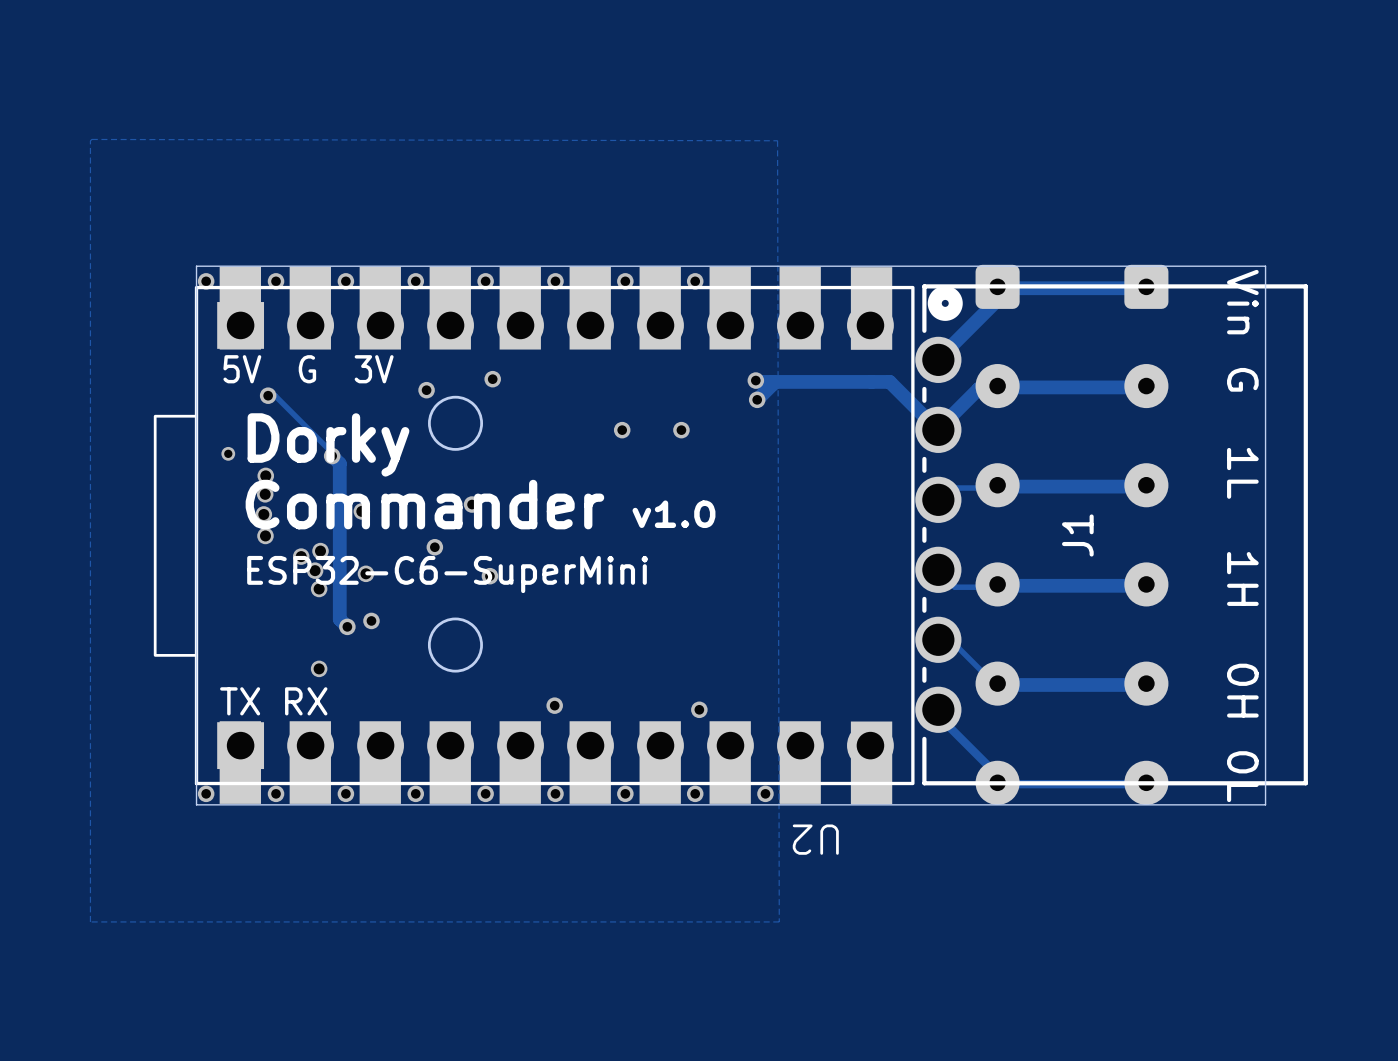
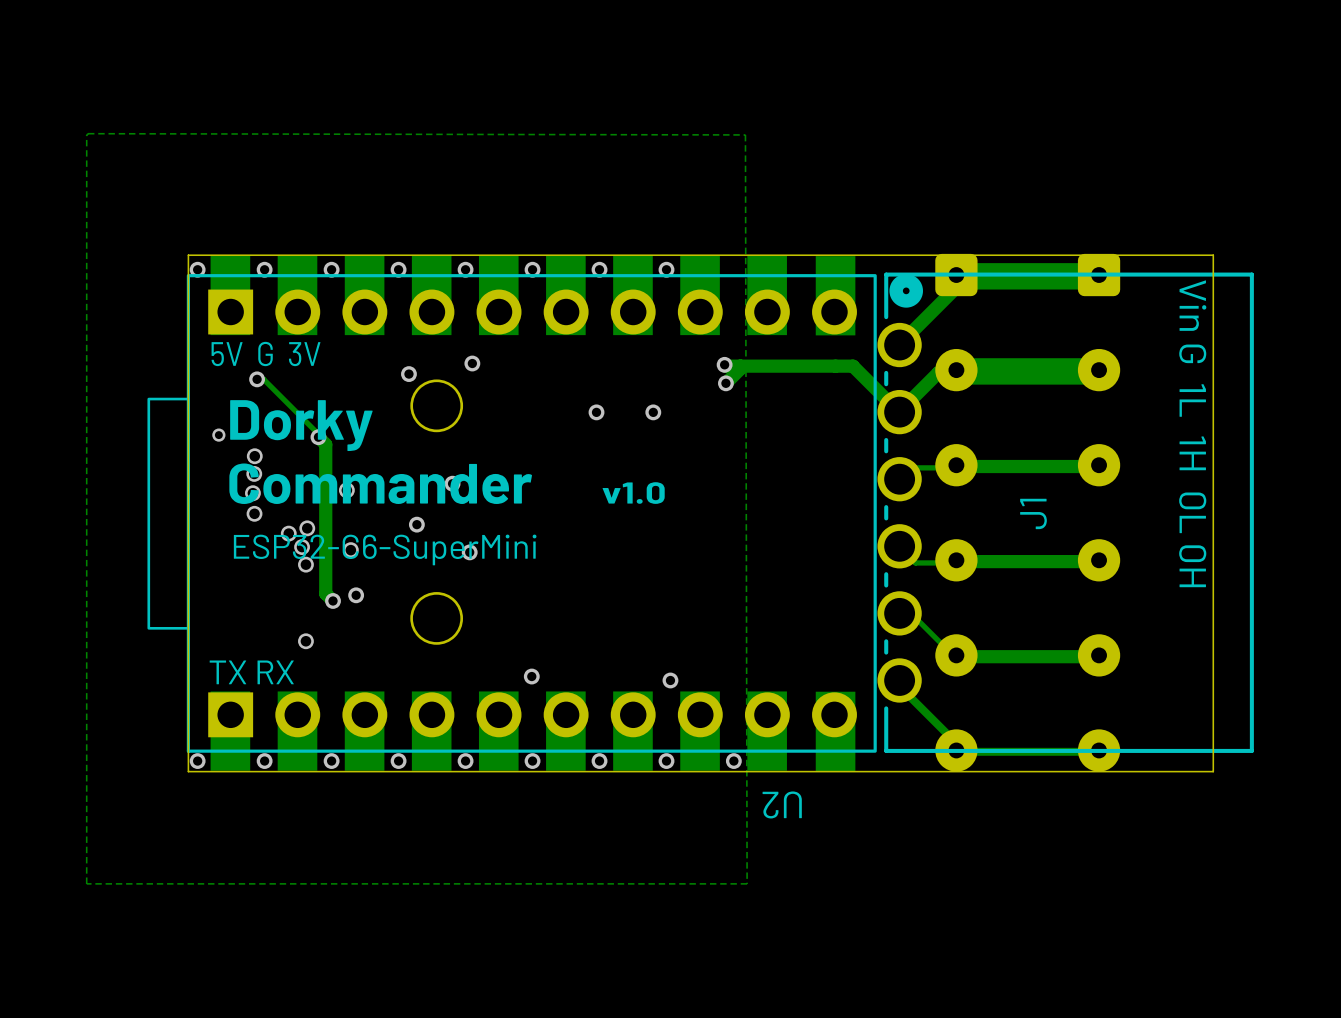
track width: thin (1145, 288) (996, 288) -> thick (1098, 276) (955, 276)
track width: thin (1145, 387) (996, 387) -> thick (1098, 371) (955, 371)
text: Vin G 1L 1H 0H 0L (1242, 535) -> Vin G 1L 1H 0L 0H (1192, 433)

